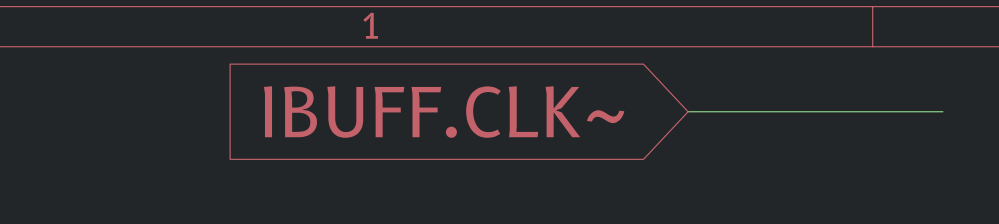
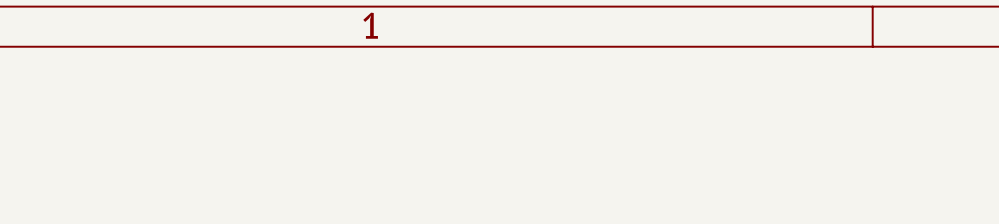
wire: (688, 111) (942, 111) -> none
global label: IBUFF.CLK~ (444, 112) -> none

